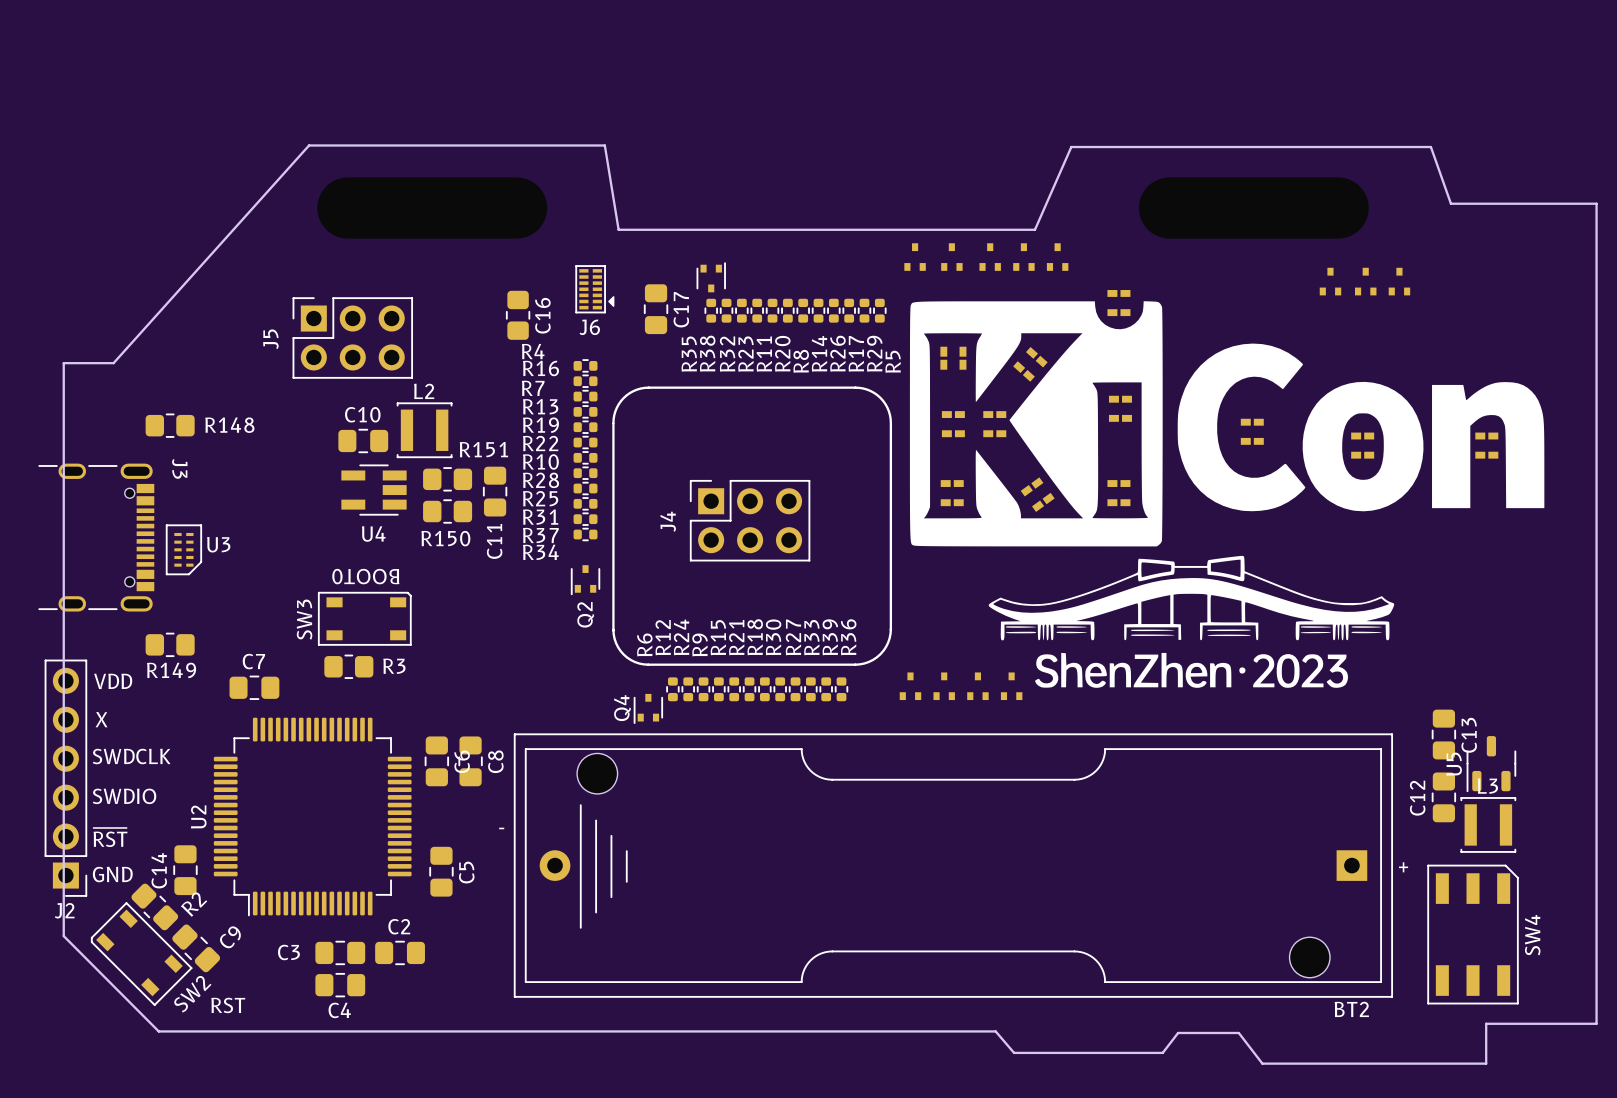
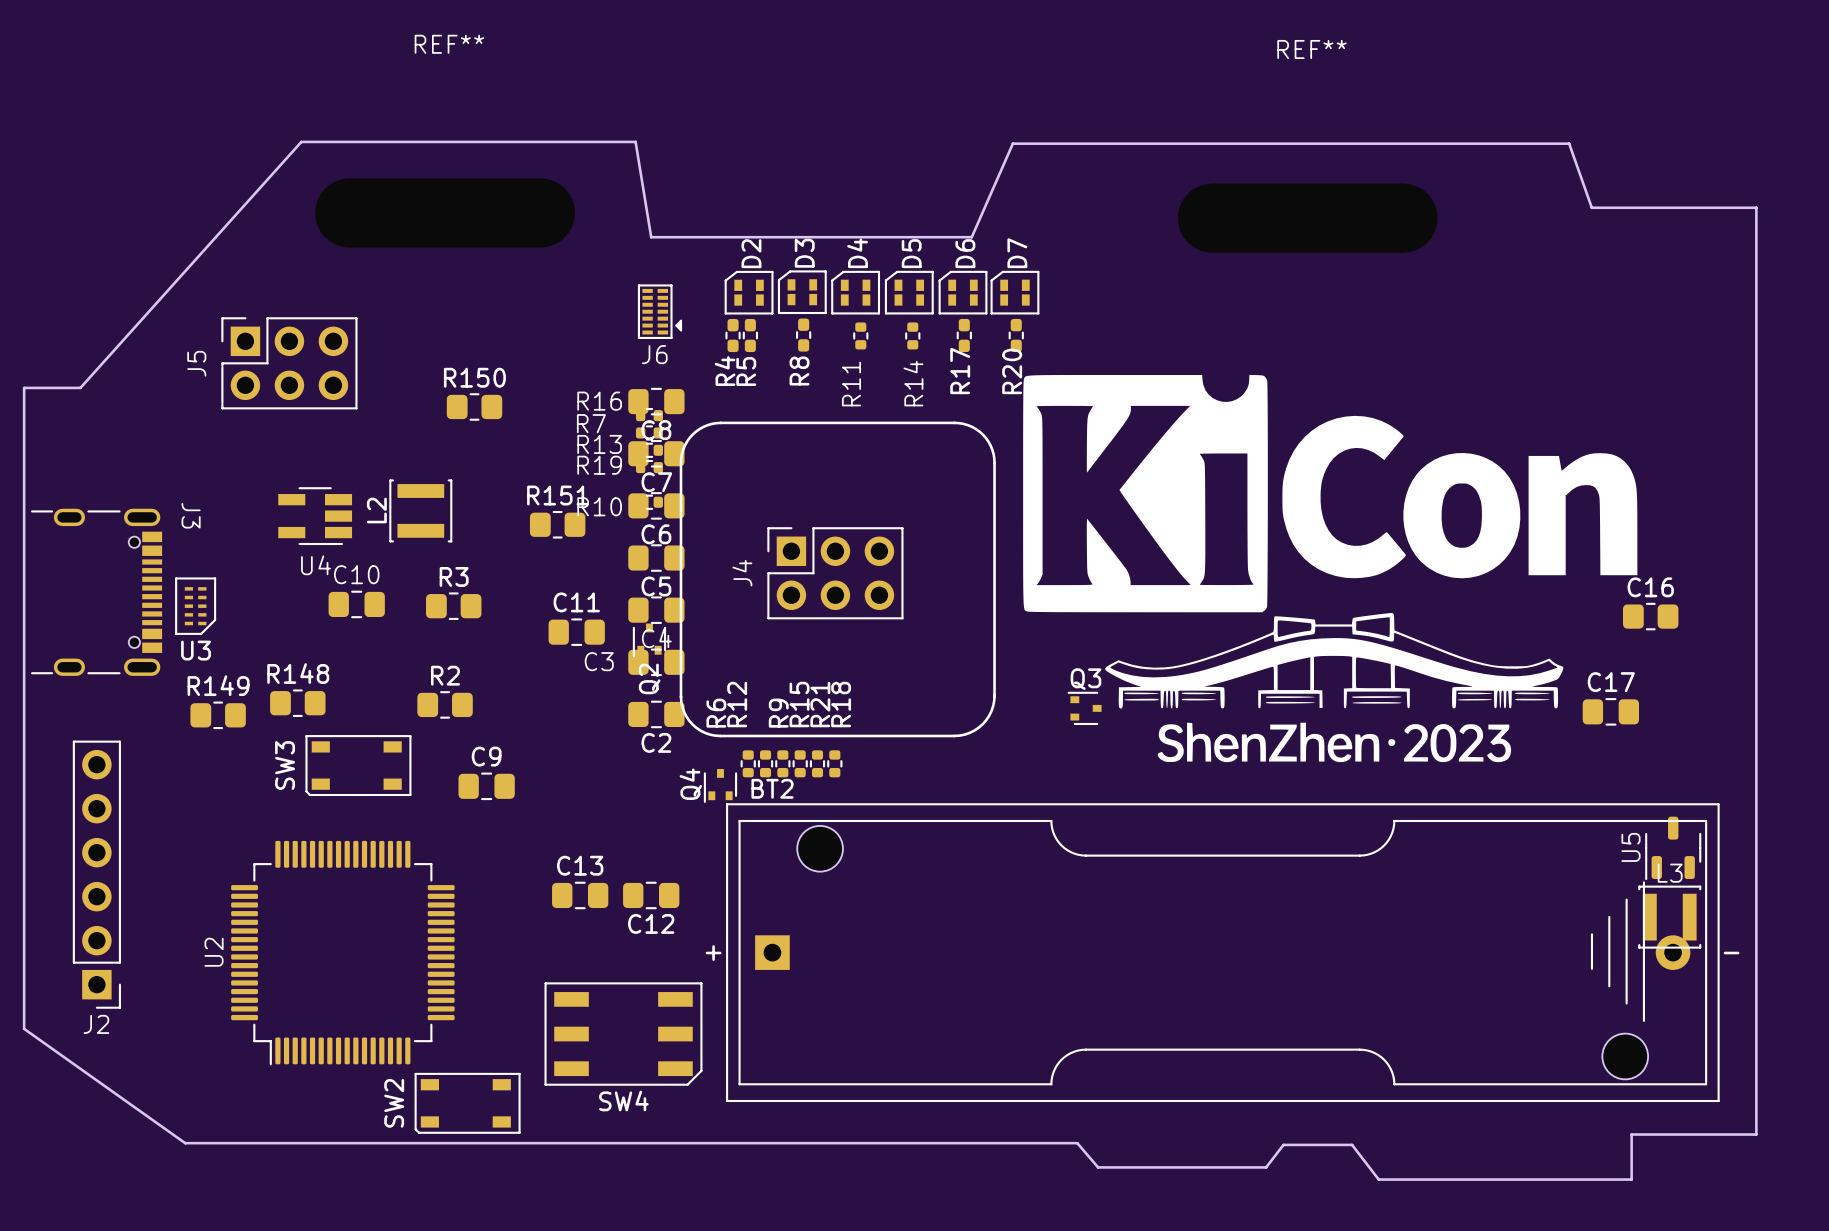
board edge: (309, 145) (604, 145) (618, 229) (1034, 229) (1071, 147) (1430, 147) (1450, 203) (1596, 203) (1596, 1023) (1486, 1023) (1486, 1063) (1262, 1063) (1238, 1032) (1178, 1032) (1162, 1052) (1014, 1052) (995, 1031) (158, 1031) (63, 936) (63, 363) (113, 363) (309, 145) -> (301, 141) (80, 387) (24, 387) (24, 1028) (185, 1143) (1077, 1143) (1098, 1167) (1266, 1167) (1283, 1144) (1352, 1144) (1378, 1179) (1631, 1179) (1631, 1134) (1756, 1134) (1756, 207) (1591, 207) (1569, 143) (1012, 143) (971, 237) (651, 237) (635, 141) (301, 141)
REF**: none -> (445, 212)
REF**: none -> (1307, 218)
part: (432, 208) -> none
part: (1253, 208) -> none
part: (915, 257) -> none
part: (951, 257) -> none
part: (990, 257) -> none
part: (1023, 257) -> none
part: (1057, 257) -> none
D2: none -> (749, 292)
D3: none -> (802, 292)
D4: none -> (855, 292)
D5: none -> (909, 292)
D6: none -> (963, 292)
D7: none -> (1014, 292)
part: (711, 277) -> none
part: (1330, 281) -> none
part: (1365, 281) -> none
part: (1399, 281) -> none
R20 footprint: [781, 298, 795, 323] -> [1008, 318, 1024, 353]
R8 footprint: [796, 298, 810, 323] -> [796, 318, 812, 352]
R17 footprint: [842, 298, 856, 323] -> [956, 318, 972, 353]
R5 footprint: [873, 298, 887, 323] -> [742, 318, 758, 353]
drawing: [909, 301, 1545, 547] -> none
part: (1118, 303) -> none
C17 rotation: 0° (656, 309) -> 90° clockwise (1610, 711)
C17 position: (656, 309) -> (1610, 711)
C17 name position: C17 (681, 309) -> C17 (1611, 682)
R35: (711, 310) -> none
R38: (726, 310) -> none
R32: (741, 310) -> none
R23: (757, 310) -> none
R26: (833, 310) -> none
R29: (864, 310) -> none
C16 rotation: 0° (518, 315) -> 90° clockwise (1650, 616)
C16 position: (518, 315) -> (1650, 616)
C16 name position: C16 (542, 315) -> C16 (1650, 587)
J5 position: (352, 337) -> (289, 363)
drawing: none -> [1023, 374, 1638, 613]
R4 name position: R4 (533, 351) -> R4 (725, 371)
part: (953, 358) -> none
R4 footprint: [573, 359, 598, 373] -> [725, 318, 741, 353]
part: (1030, 364) -> none
L2 name position: L2 (424, 391) -> L2 (376, 510)
part: (1120, 408) -> none
part: (953, 424) -> none
part: (994, 424) -> none
R148 position: (170, 425) -> (297, 703)
R148 name position: R148 (229, 425) -> R148 (298, 673)
L2 rotation: 0° (424, 430) -> 90° clockwise (420, 510)
L2 position: (424, 430) -> (420, 510)
part: (1252, 431) -> none
C10 position: (363, 441) -> (356, 604)
R22: (585, 442) -> none
part: (1362, 445) -> none
part: (1486, 445) -> none
R151 name position: R151 (483, 449) -> R151 (558, 495)
R28: (585, 473) -> none
R150 position: (447, 479) -> (474, 406)
R25: (585, 488) -> none
U4 position: (374, 490) -> (315, 516)
C11 rotation: 0° (495, 491) -> 90° clockwise (576, 632)
C11 position: (495, 491) -> (576, 632)
part: (952, 493) -> none
part: (1118, 493) -> none
part: (1037, 494) -> none
R31: (585, 503) -> none
R151 position: (447, 511) -> (557, 524)
R37: (585, 519) -> none
R34: (585, 534) -> none
R150 name position: R150 (445, 538) -> R150 (474, 377)
C11 name position: C11 (494, 541) -> C11 (576, 602)
U3 name position: U3 (218, 544) -> U3 (196, 650)
text: BOOT0 (365, 576) -> none
SW3 rotation: 0° (364, 618) -> 180° (358, 765)
SW3 position: (364, 618) -> (358, 765)
Q3: none -> (1084, 708)
R149 position: (170, 644) -> (218, 715)
C7 name position: C7 (253, 661) -> C7 (656, 482)
R3 position: (348, 666) -> (453, 606)
R3 name position: R3 (394, 666) -> R3 (454, 576)
R149 name position: R149 (171, 670) -> R149 (218, 685)
text: VDD (113, 681) -> none
part: (910, 686) -> none
part: (944, 686) -> none
part: (977, 686) -> none
part: (1011, 686) -> none
C7 position: (254, 687) -> (656, 453)
R24: (764, 689) -> none
R30: (780, 689) -> none
R27: (795, 689) -> none
R33: (810, 689) -> none
R39: (826, 689) -> none
R36: (841, 689) -> none
text: X (101, 719) -> none
BT2 footprint: [513, 733, 1394, 998] -> [726, 803, 1720, 1103]
C13 rotation: 0° (1443, 734) -> 90° clockwise (580, 895)
C13 position: (1443, 734) -> (580, 895)
C13 name position: C13 (1469, 735) -> C13 (580, 865)
text: SWDCLK (131, 756) -> none
C6 rotation: 0° (436, 761) -> 90° clockwise (656, 505)
C6 position: (436, 761) -> (656, 505)
C8 rotation: 0° (470, 761) -> 90° clockwise (656, 401)
C8 position: (470, 761) -> (656, 401)
J2 position: (65, 778) -> (96, 874)
text: SWDIO (124, 796) -> none
C12 rotation: 0° (1443, 797) -> 90° clockwise (651, 895)
C12 position: (1443, 797) -> (651, 895)
C12 name position: C12 (1417, 798) -> C12 (651, 923)
U2 position: (312, 816) -> (342, 953)
text: ~{RST} (110, 837) -> none
C14: (185, 870) -> none
C5 rotation: 0° (441, 871) -> 90° clockwise (656, 558)
C5 position: (441, 871) -> (656, 558)
text: GND (112, 874) -> none
R2 rotation: 0° (154, 906) -> 45° counterclockwise (445, 704)
R2 position: (154, 906) -> (445, 704)
C2 name position: C2 (399, 926) -> C2 (656, 742)
SW4 rotation: 0° (1473, 934) -> 90° clockwise (623, 1034)
SW4 position: (1473, 934) -> (623, 1034)
C9 rotation: 0° (196, 948) -> 45° counterclockwise (486, 786)
C9 position: (196, 948) -> (486, 786)
C3 position: (340, 952) -> (656, 662)
C2 position: (400, 952) -> (656, 714)
SW2 rotation: 0° (141, 954) -> 45° counterclockwise (467, 1103)
SW2 position: (141, 954) -> (467, 1103)
C4 position: (340, 985) -> (656, 610)
SW2 name position: SW2 (192, 994) -> SW2 (394, 1103)
text: RST (228, 1005) -> none
BT2 name position: BT2 (1351, 1009) -> BT2 (772, 788)

